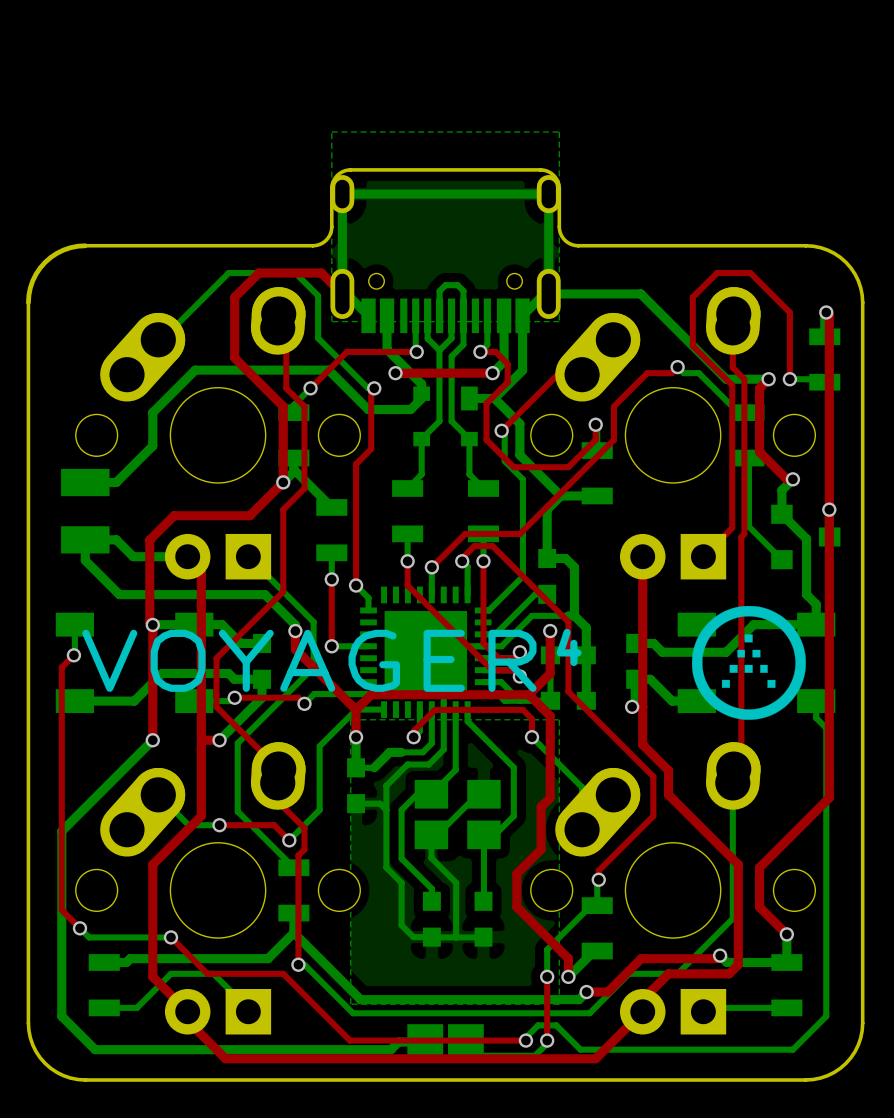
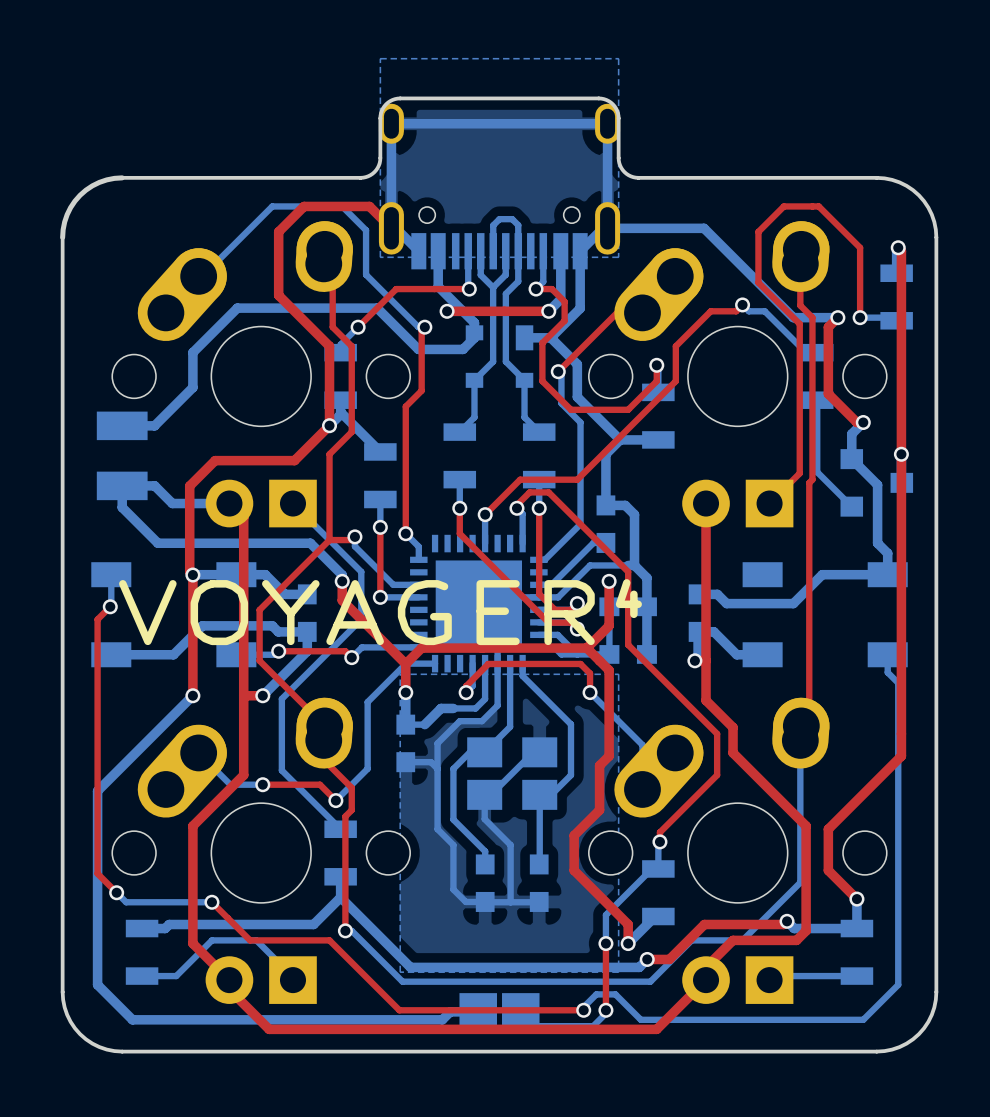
bottom track: none -> (354, 536) (354, 546) (393, 584) (418, 584)
top track: none -> (354, 536) (351, 540) (329, 540)
via: none -> (354, 536)
drawing: [692, 605, 806, 720] -> none

